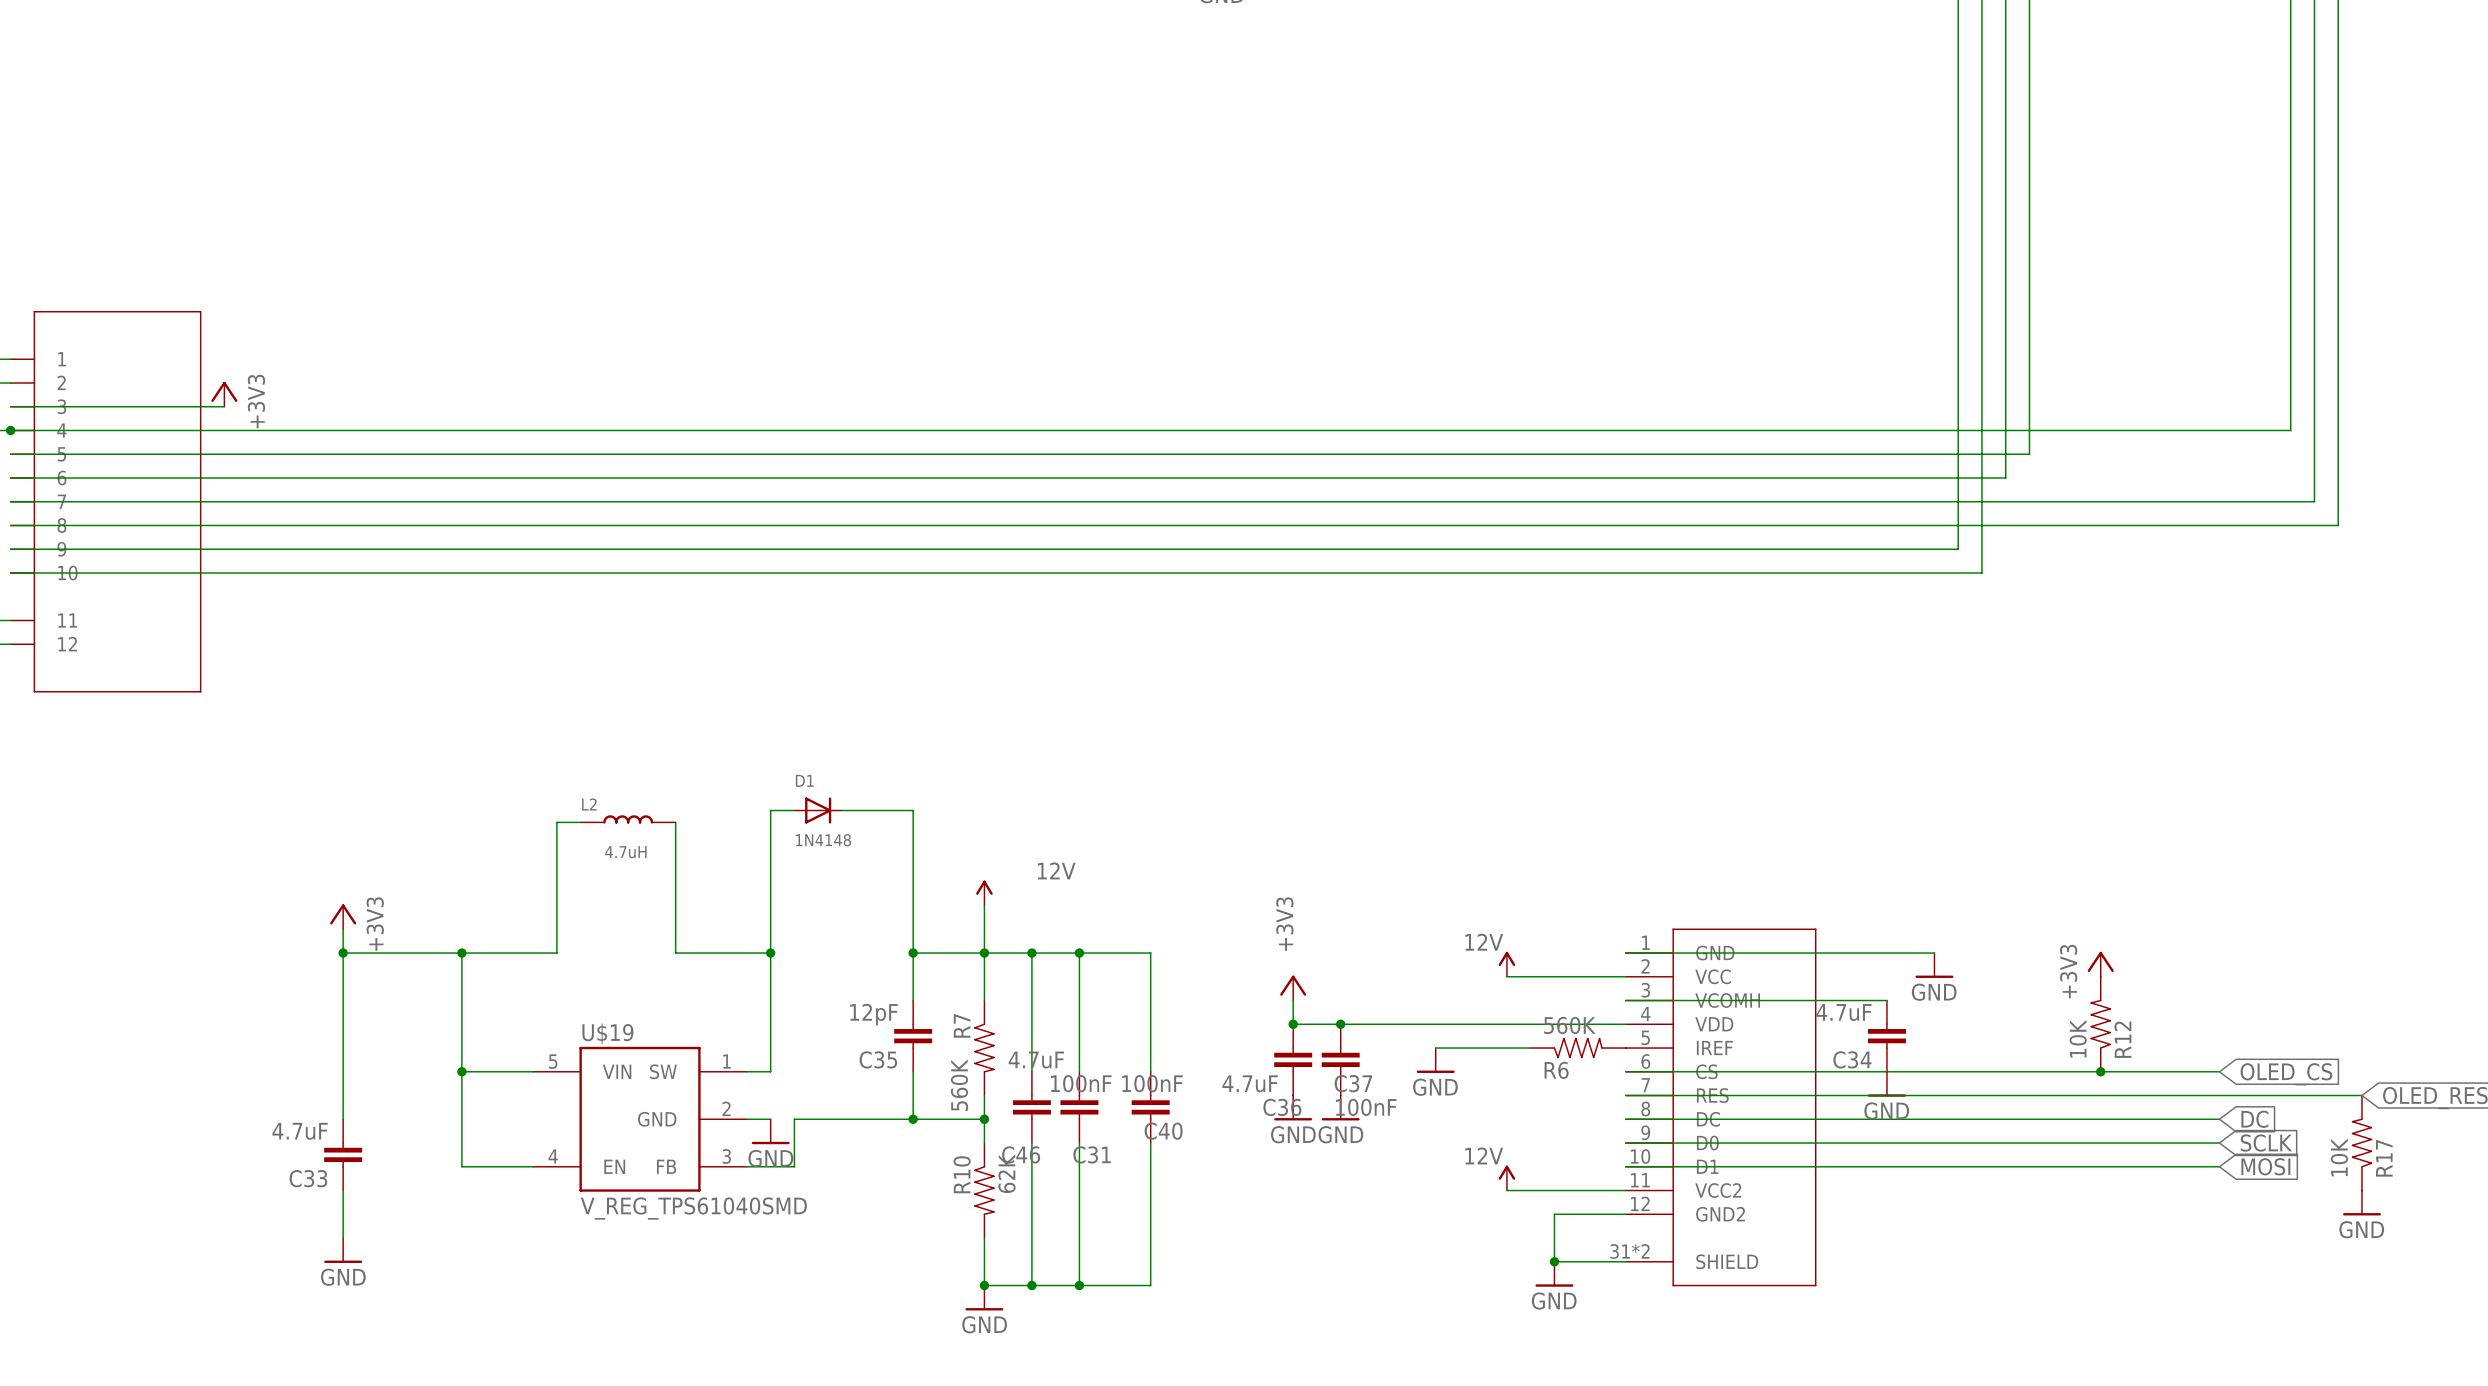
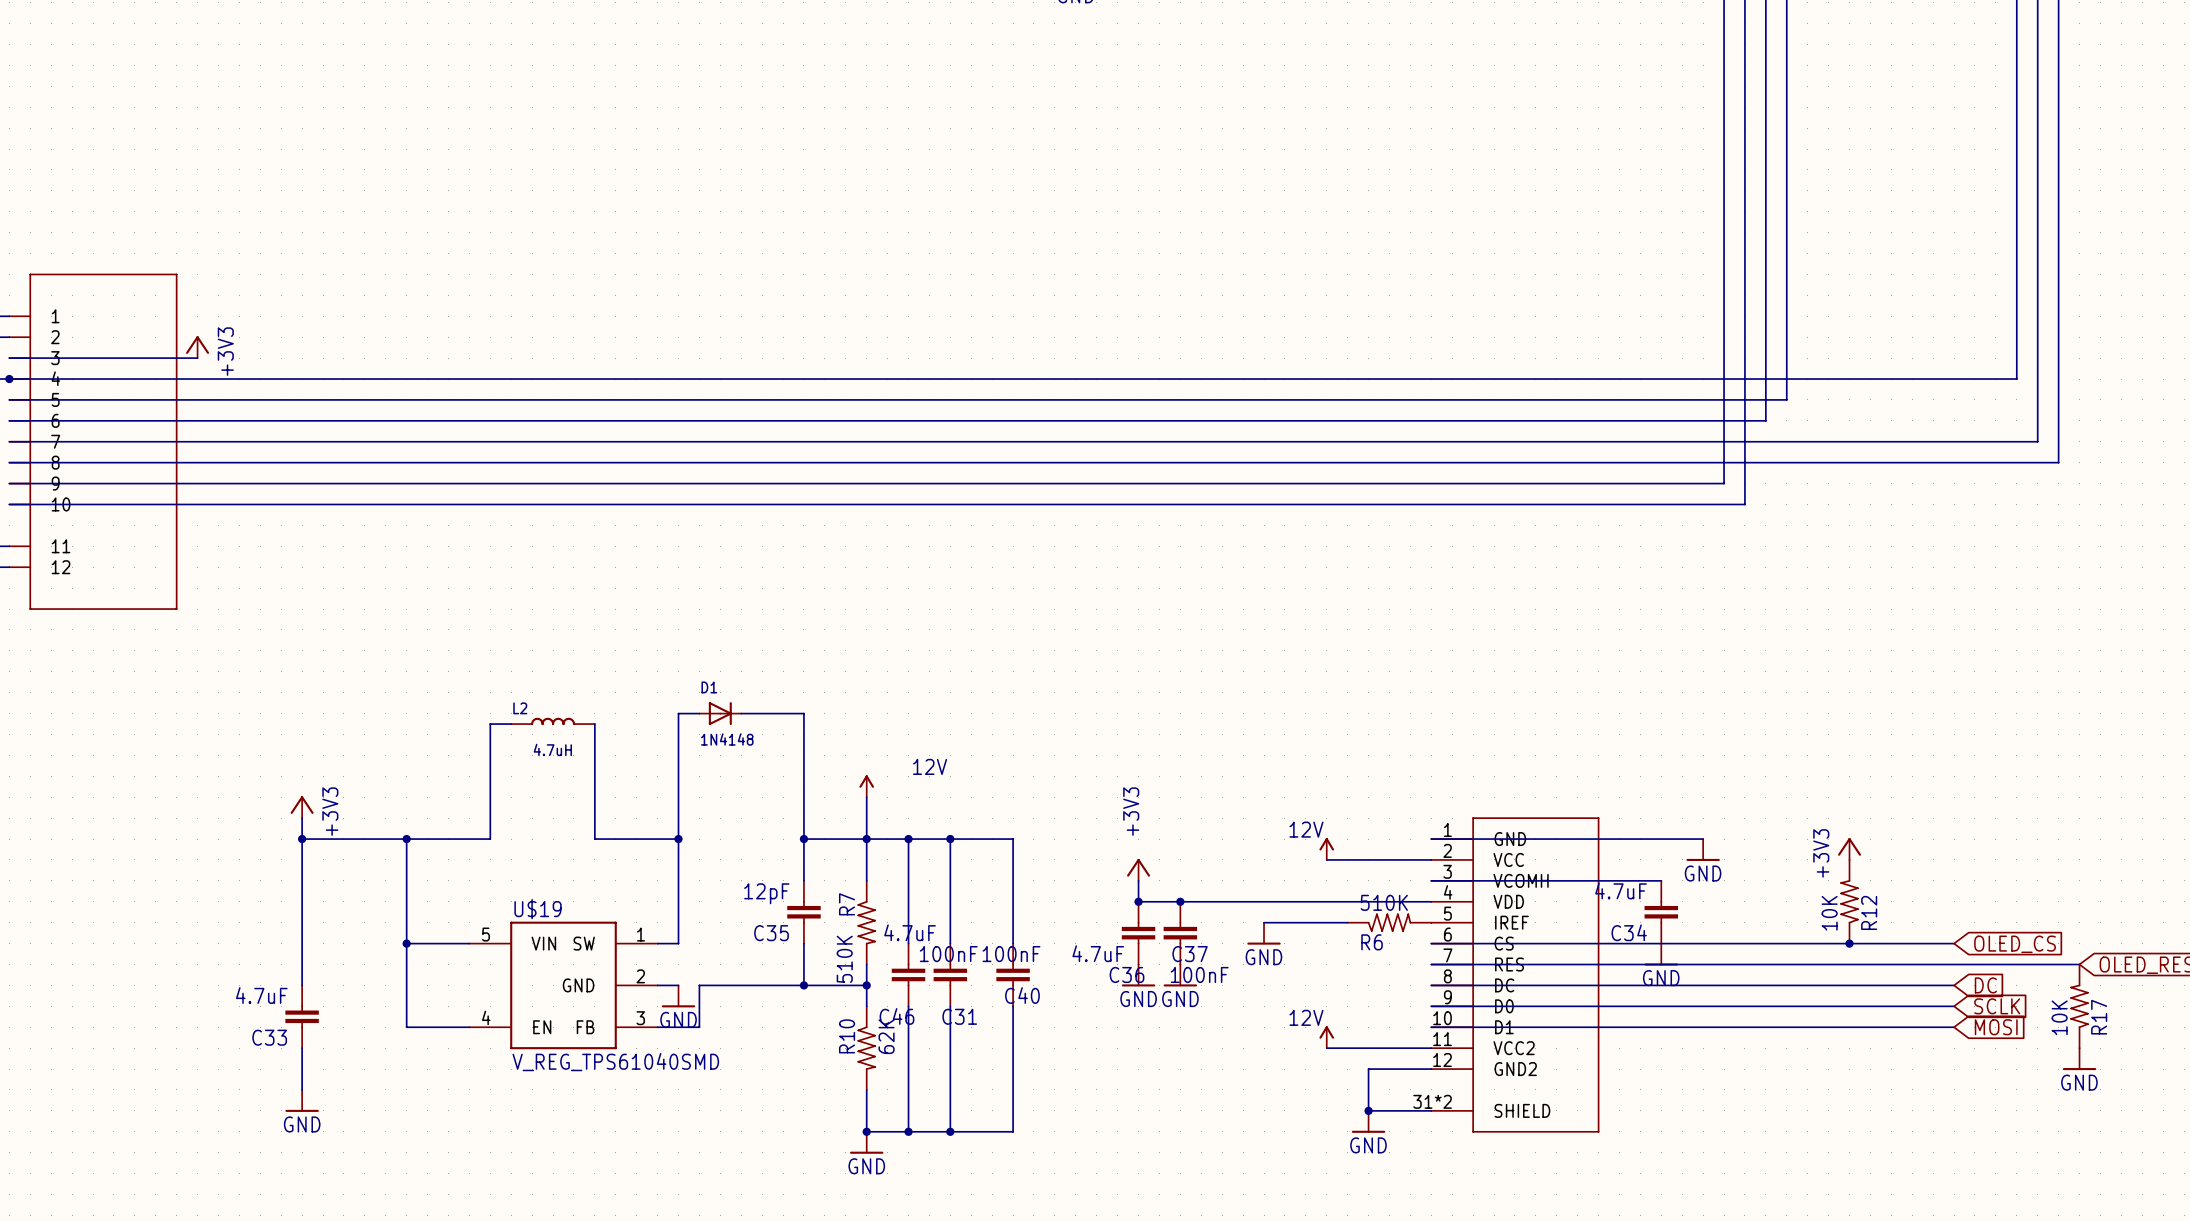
R6 value: 560K (1569, 1025) -> 510K (1384, 902)
R7 value: 560K (959, 1085) -> 510K (844, 959)

